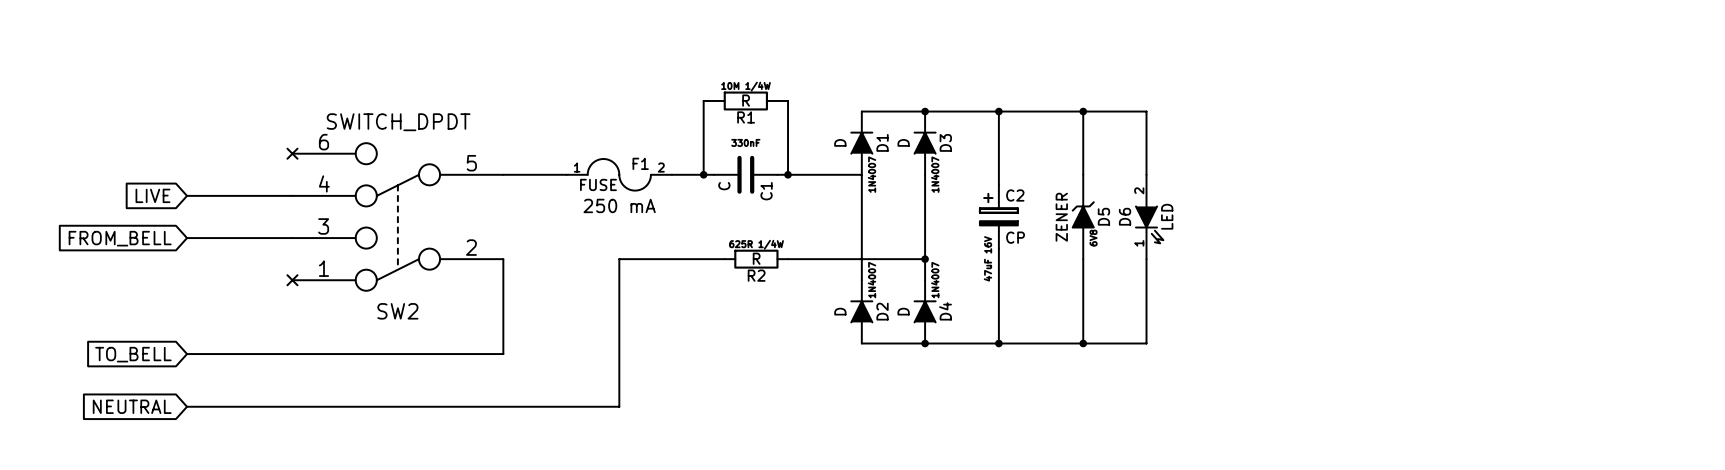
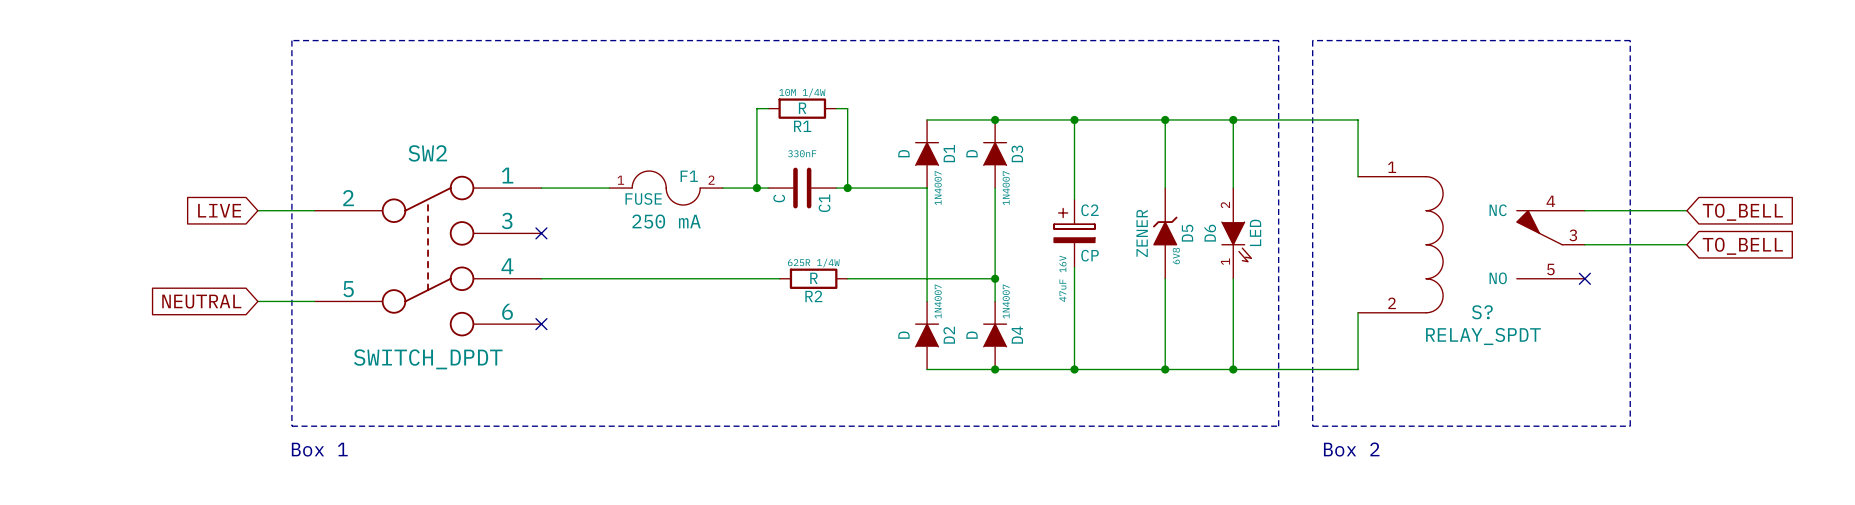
line: none -> (291, 40) (1278, 40) (1278, 426) (291, 426) (291, 40)
line: none -> (1312, 40) (1630, 40) (1630, 426) (1312, 426) (1312, 40)
wire: none -> (1233, 119) (1358, 119) (1358, 176)
junction: none -> (1233, 119)
no-connect mark: (292, 153) -> none
global label position: LIVE (152, 195) -> LIVE (219, 210)
wire: (187, 195) (239, 195) -> (257, 301) (314, 301)
wire: none -> (1584, 210) (1686, 210)
global label: none -> TO_BELL (1742, 212)
SW2 rotation: 0° (397, 216) -> 180° (428, 256)
no-connect mark: none -> (541, 233)
S?: none -> RELAY_SPDT (1471, 244)
wire: none -> (1584, 244) (1686, 244)
global label: none -> TO_BELL (1742, 246)
global label: FROM_BELL (120, 238) -> none
wire: (187, 238) (292, 238) -> none
wire: (503, 259) (503, 354) (187, 354) -> none
wire: (619, 259) (619, 406) (187, 406) -> (666, 278) (541, 278)
no-connect mark: none -> (1584, 278)
no-connect mark: (292, 280) -> none
wire: none -> (1358, 312) (1358, 369) (1233, 369)
no-connect mark: none -> (541, 324)
junction: none -> (1233, 369)
global label: TO_BELL (133, 354) -> none
global label position: NEUTRAL (132, 406) -> NEUTRAL (201, 301)
text: none -> Box 1 (319, 449)
text: none -> Box 2 (1351, 449)

